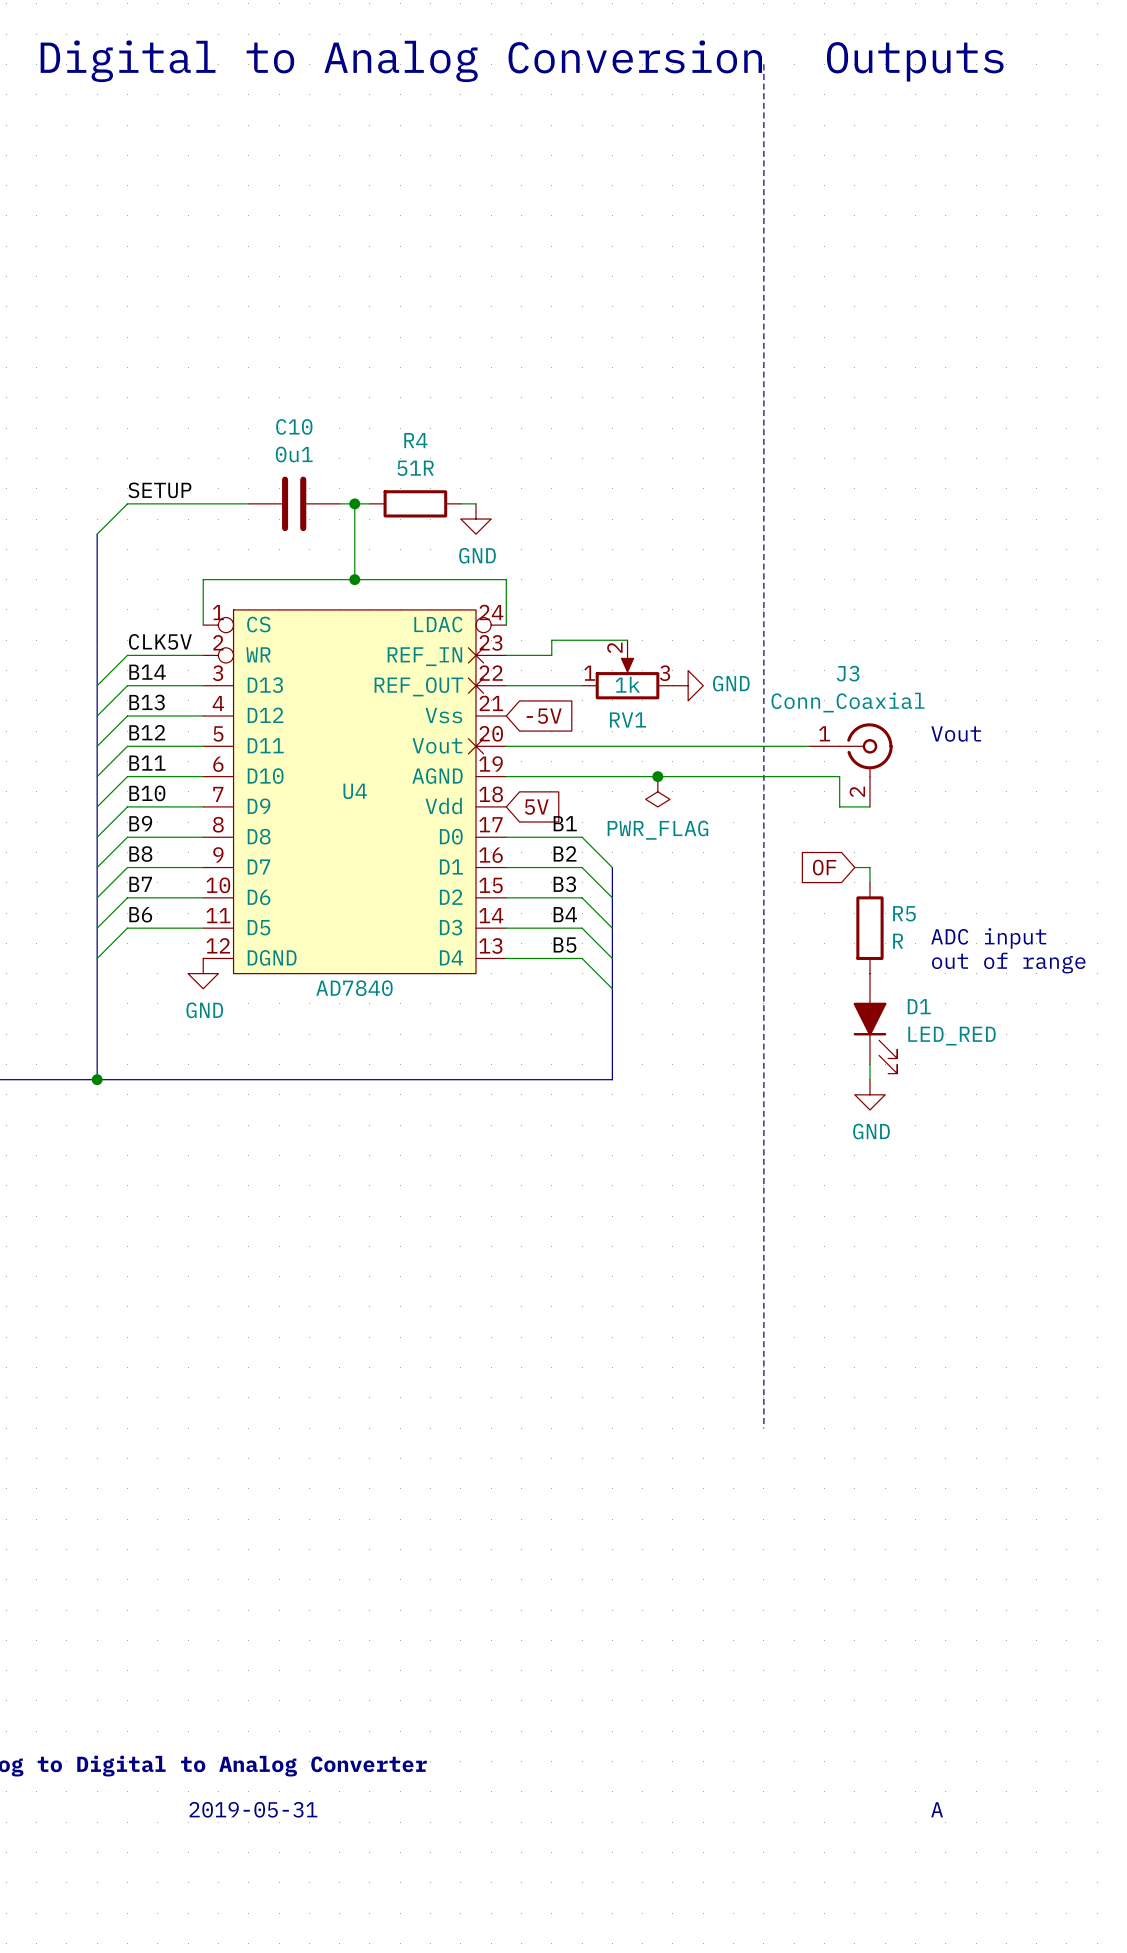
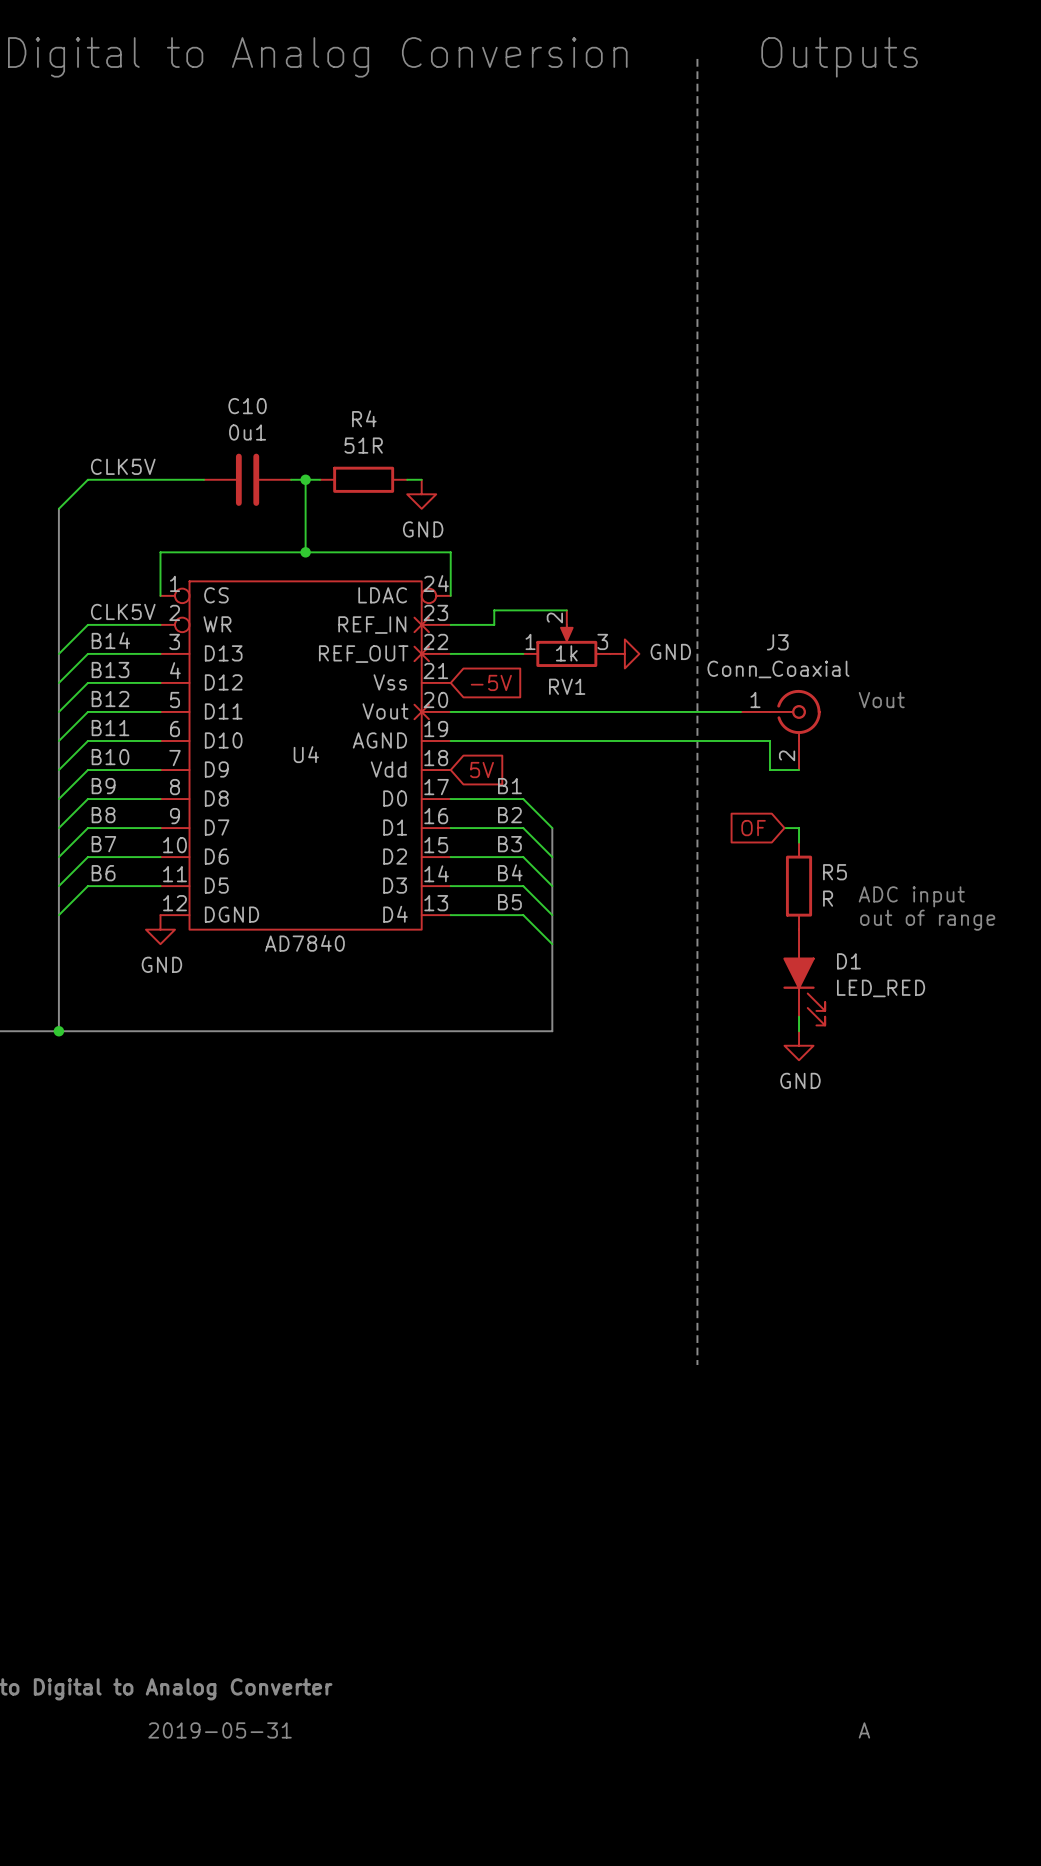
label: SETUP (159, 490) -> CLK5V (123, 466)
junction: (657, 776) -> none
power symbol: PWR_FLAG (657, 791) -> none

